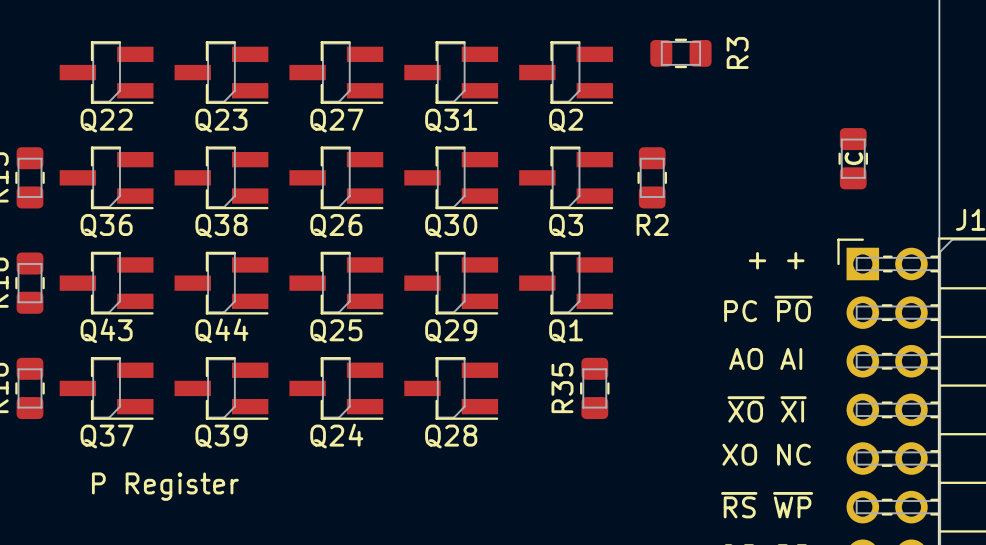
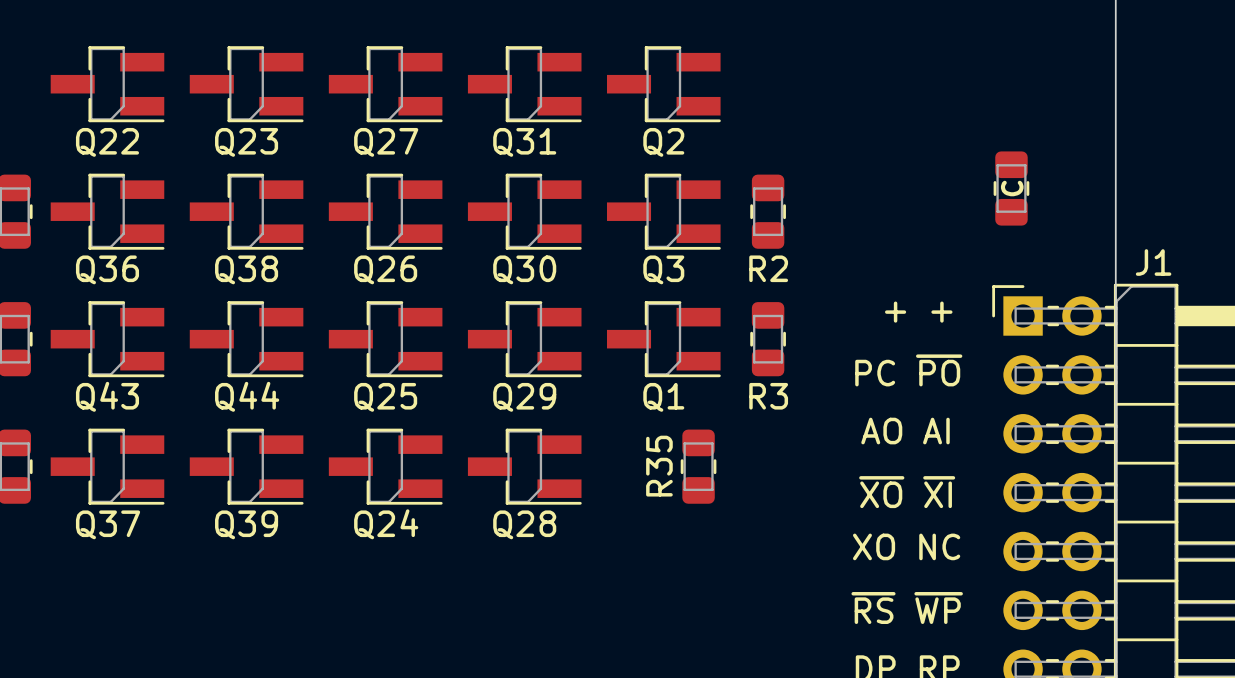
R3 rotation: 0° (680, 53) -> 90° clockwise (768, 339)
R3 position: (680, 53) -> (768, 339)
text: P Register (165, 486) -> none

